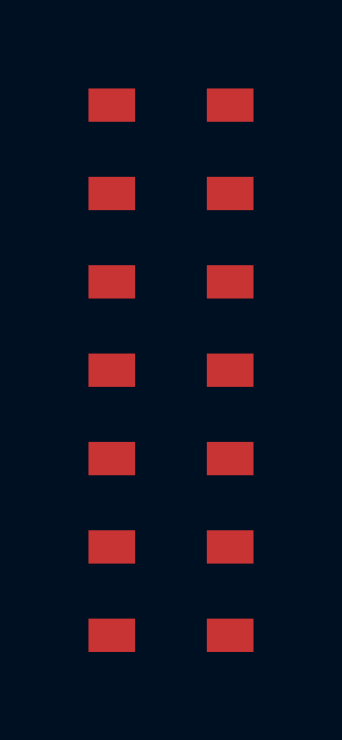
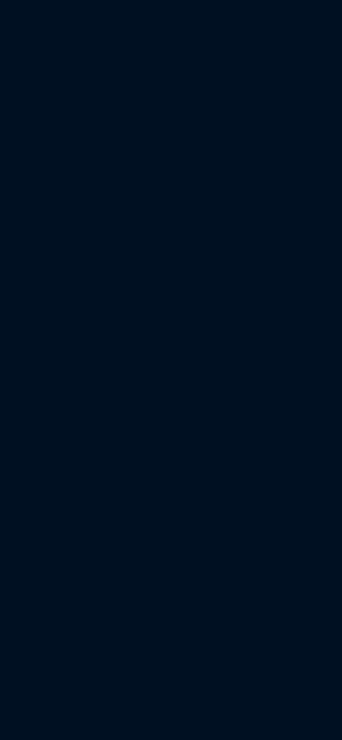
part: (170, 105) -> none
part: (170, 193) -> none
part: (170, 281) -> none
part: (170, 370) -> none
part: (170, 458) -> none
part: (170, 546) -> none
part: (170, 635) -> none

